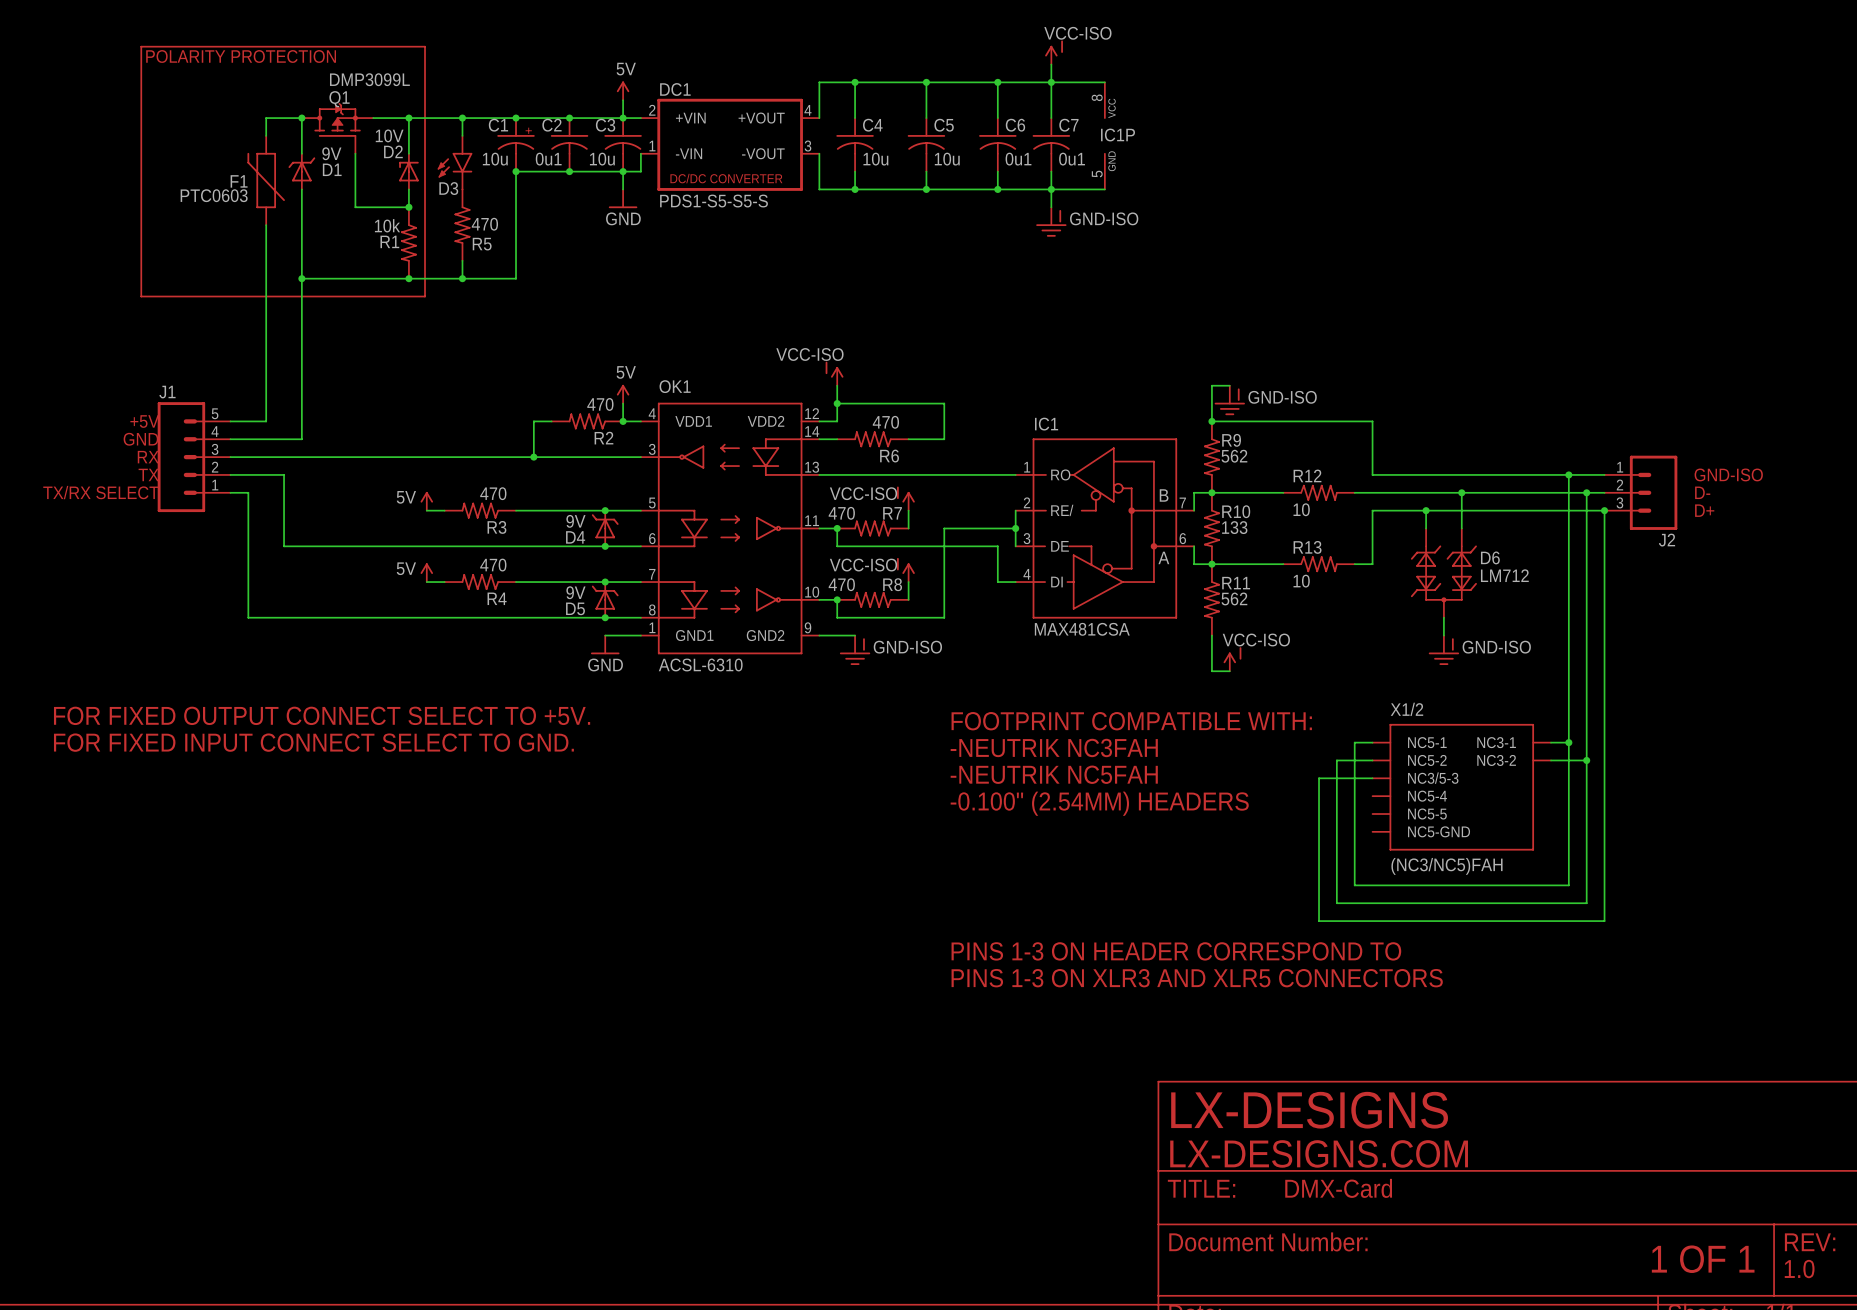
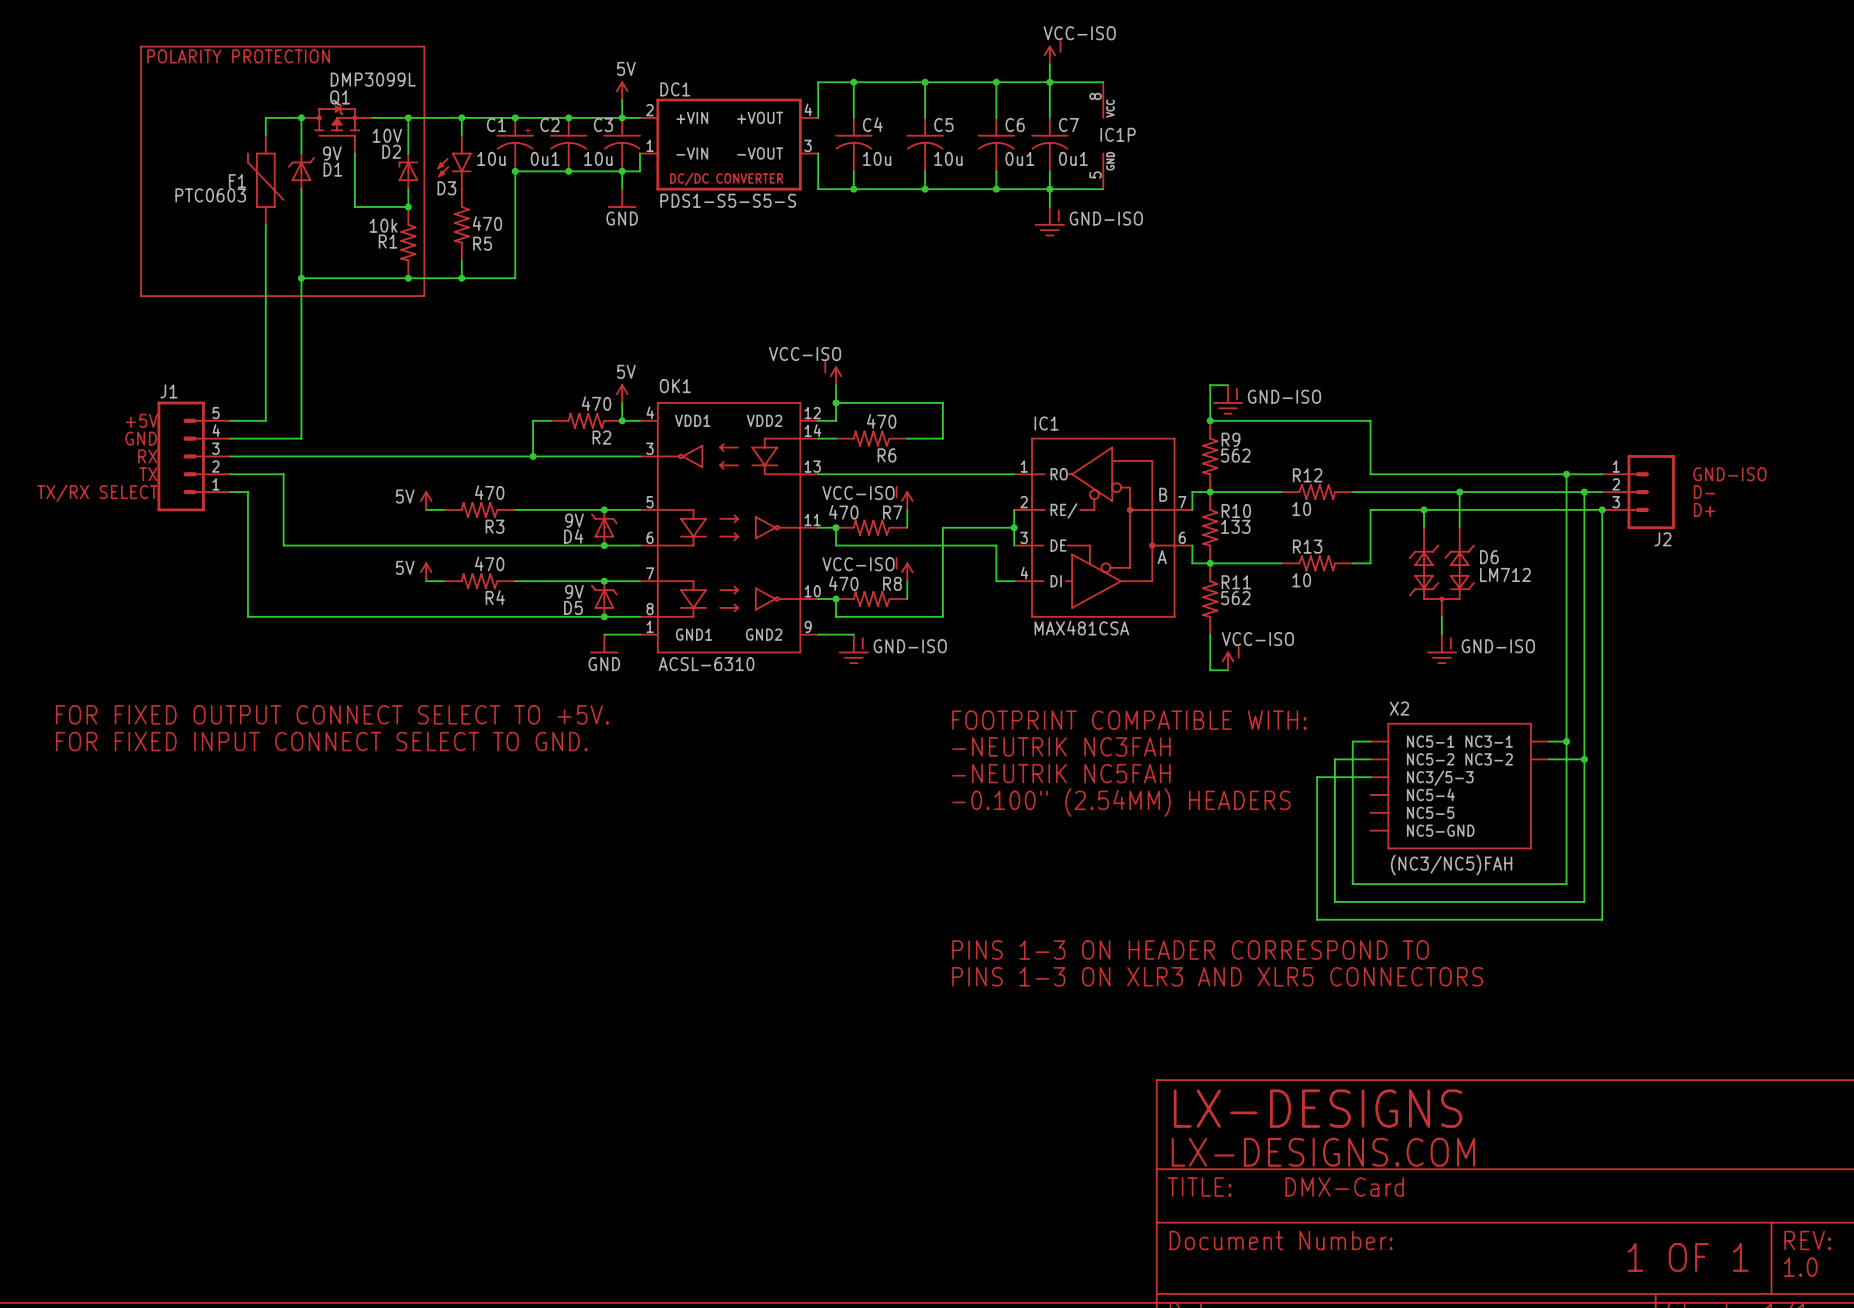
X1/2 name: X1/2 (1406, 709) -> X2 (1399, 708)

